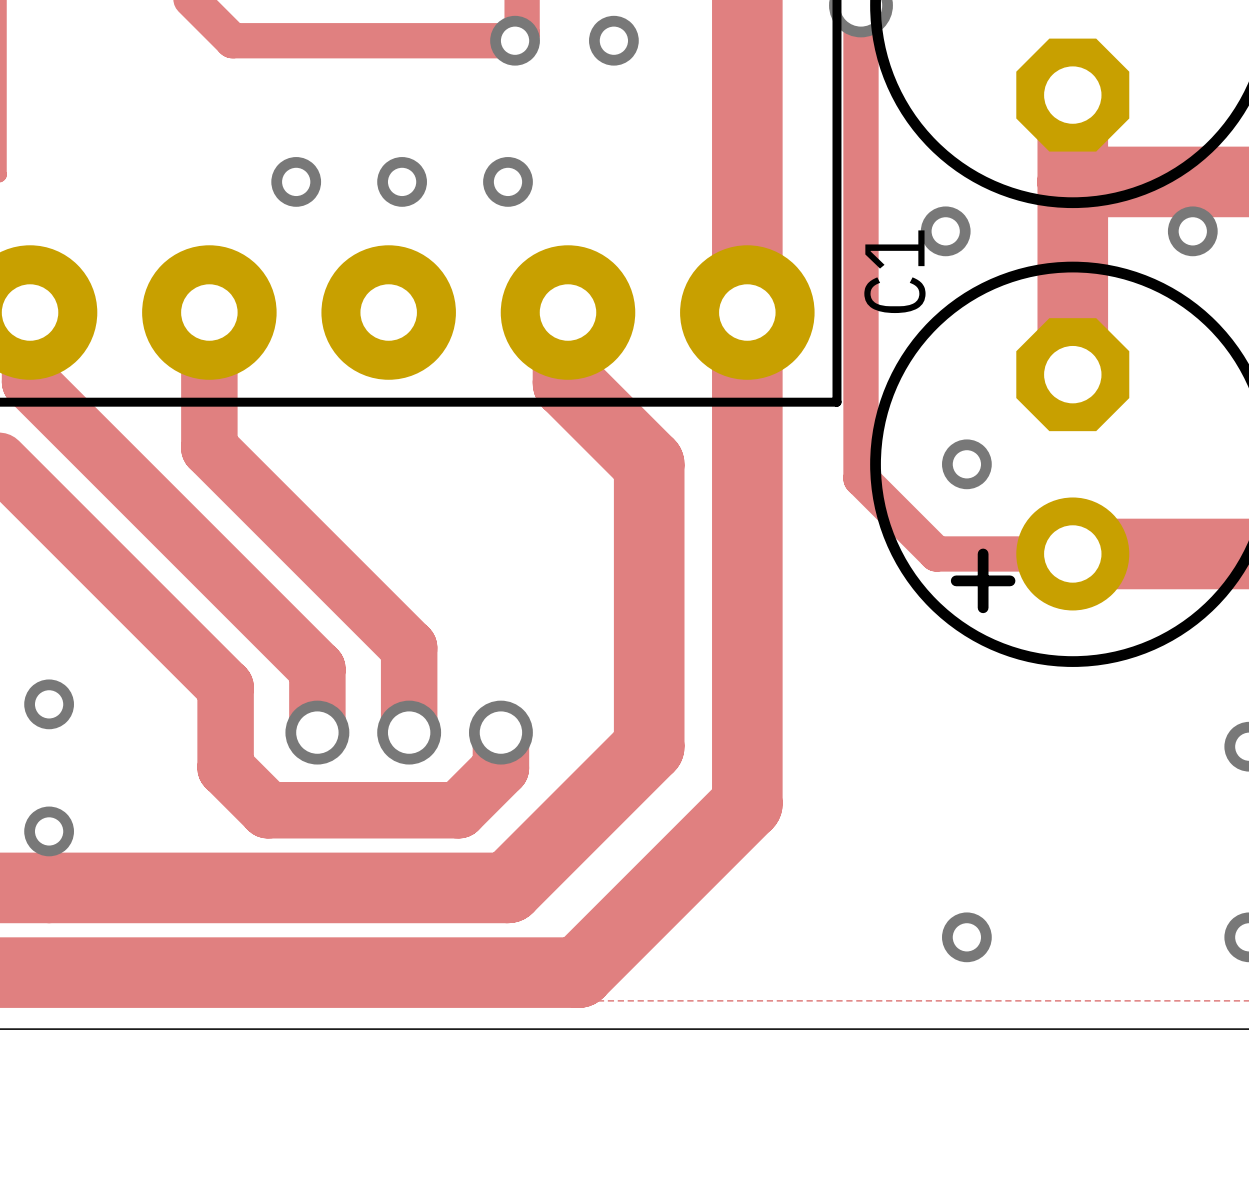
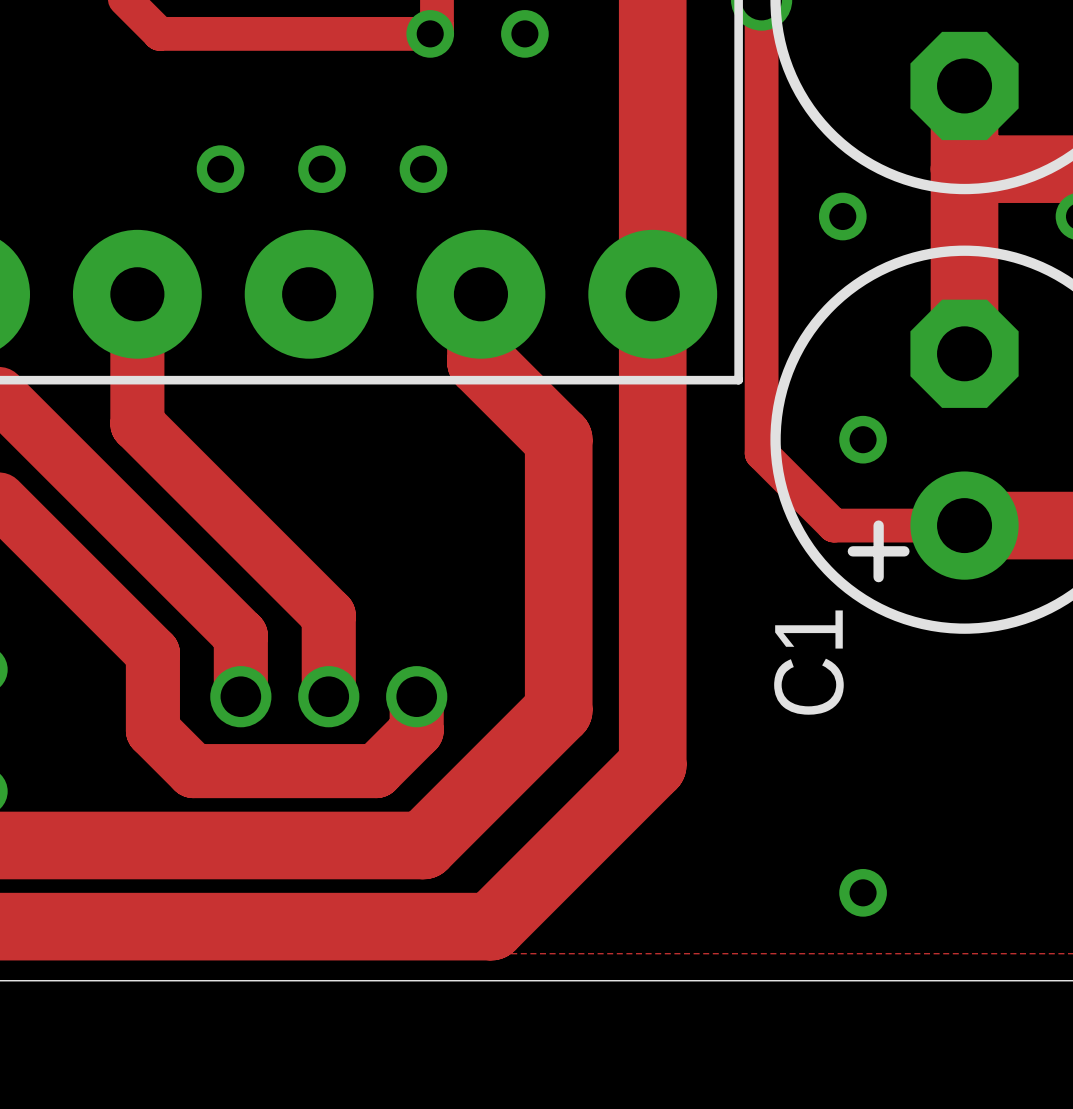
C1 name position: C1 (894, 271) -> C1 (808, 662)

